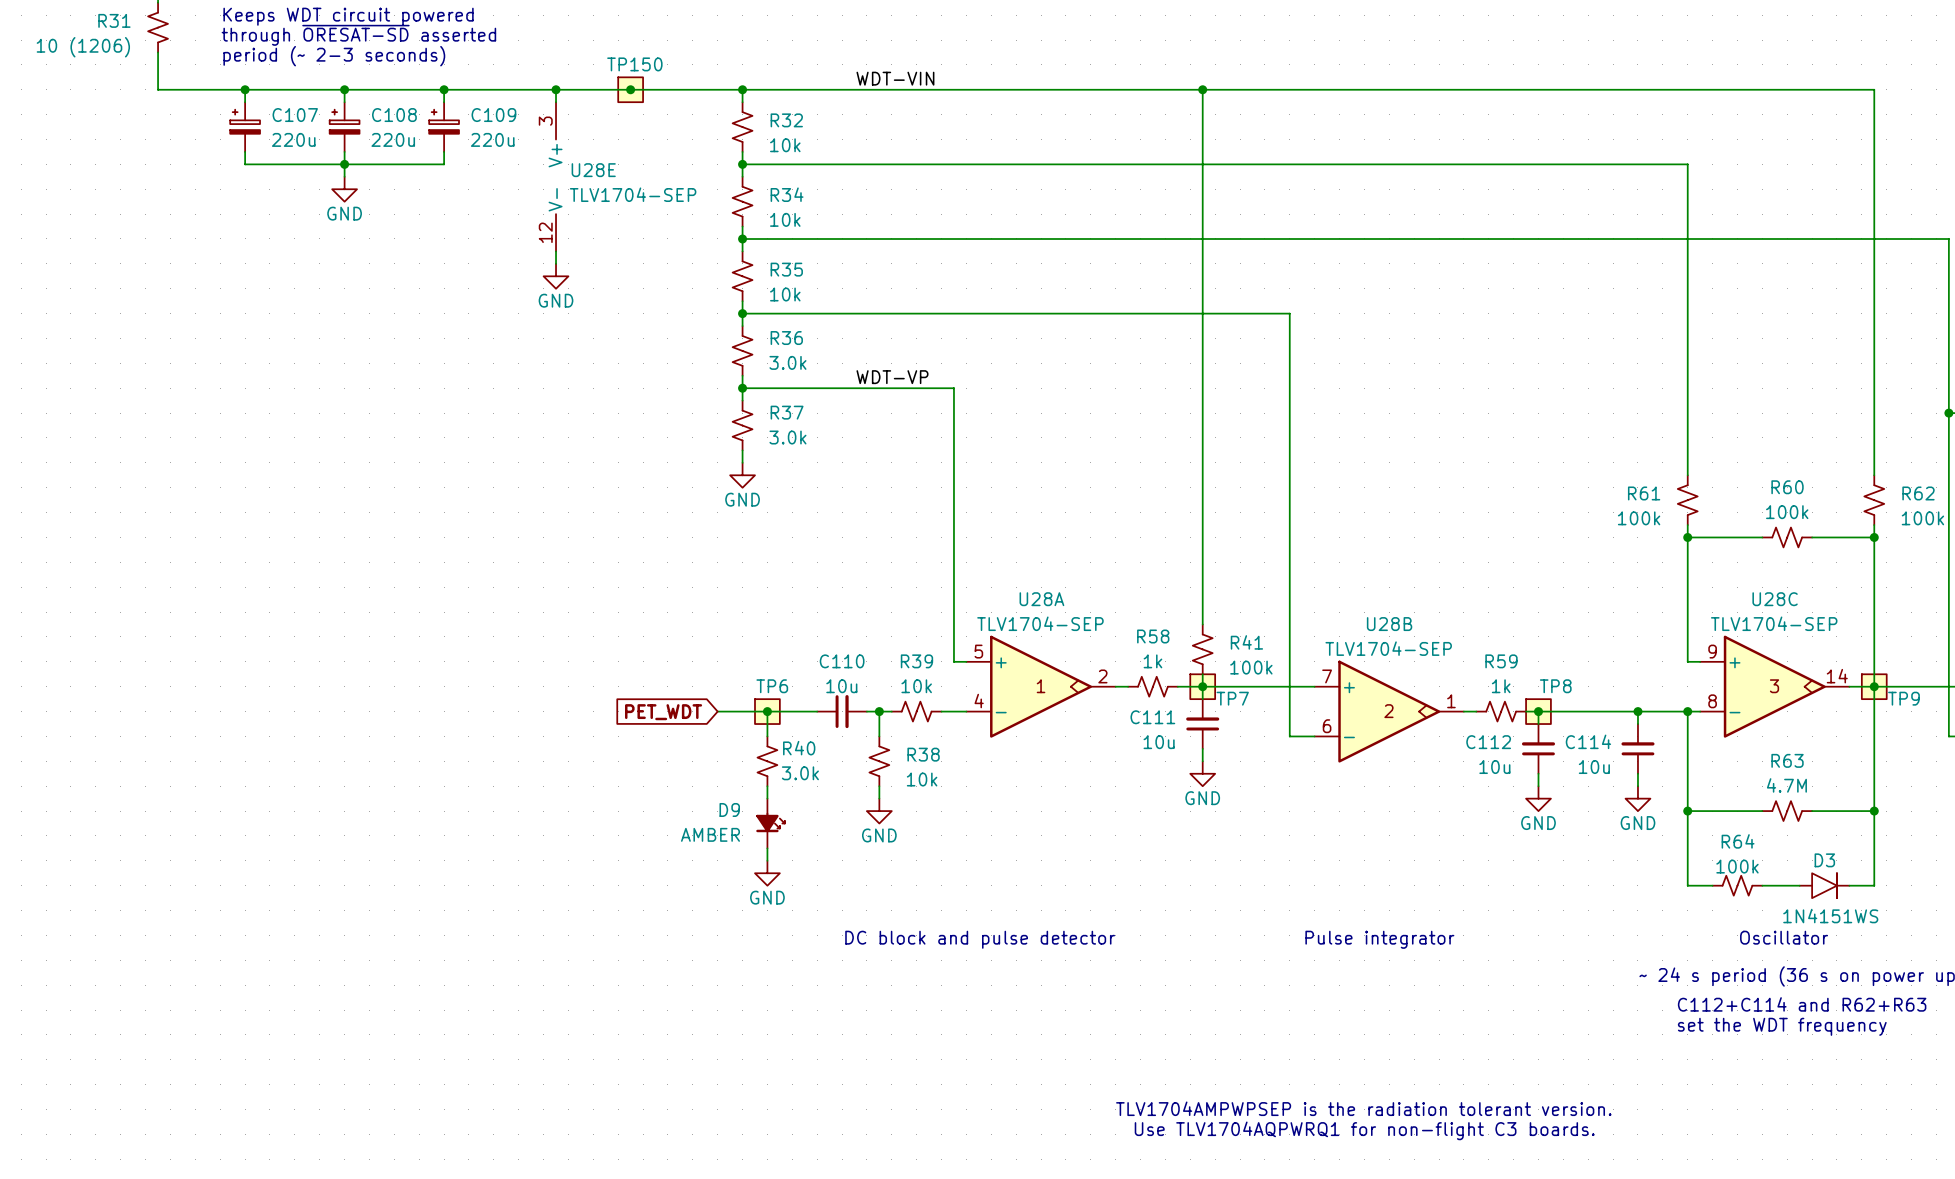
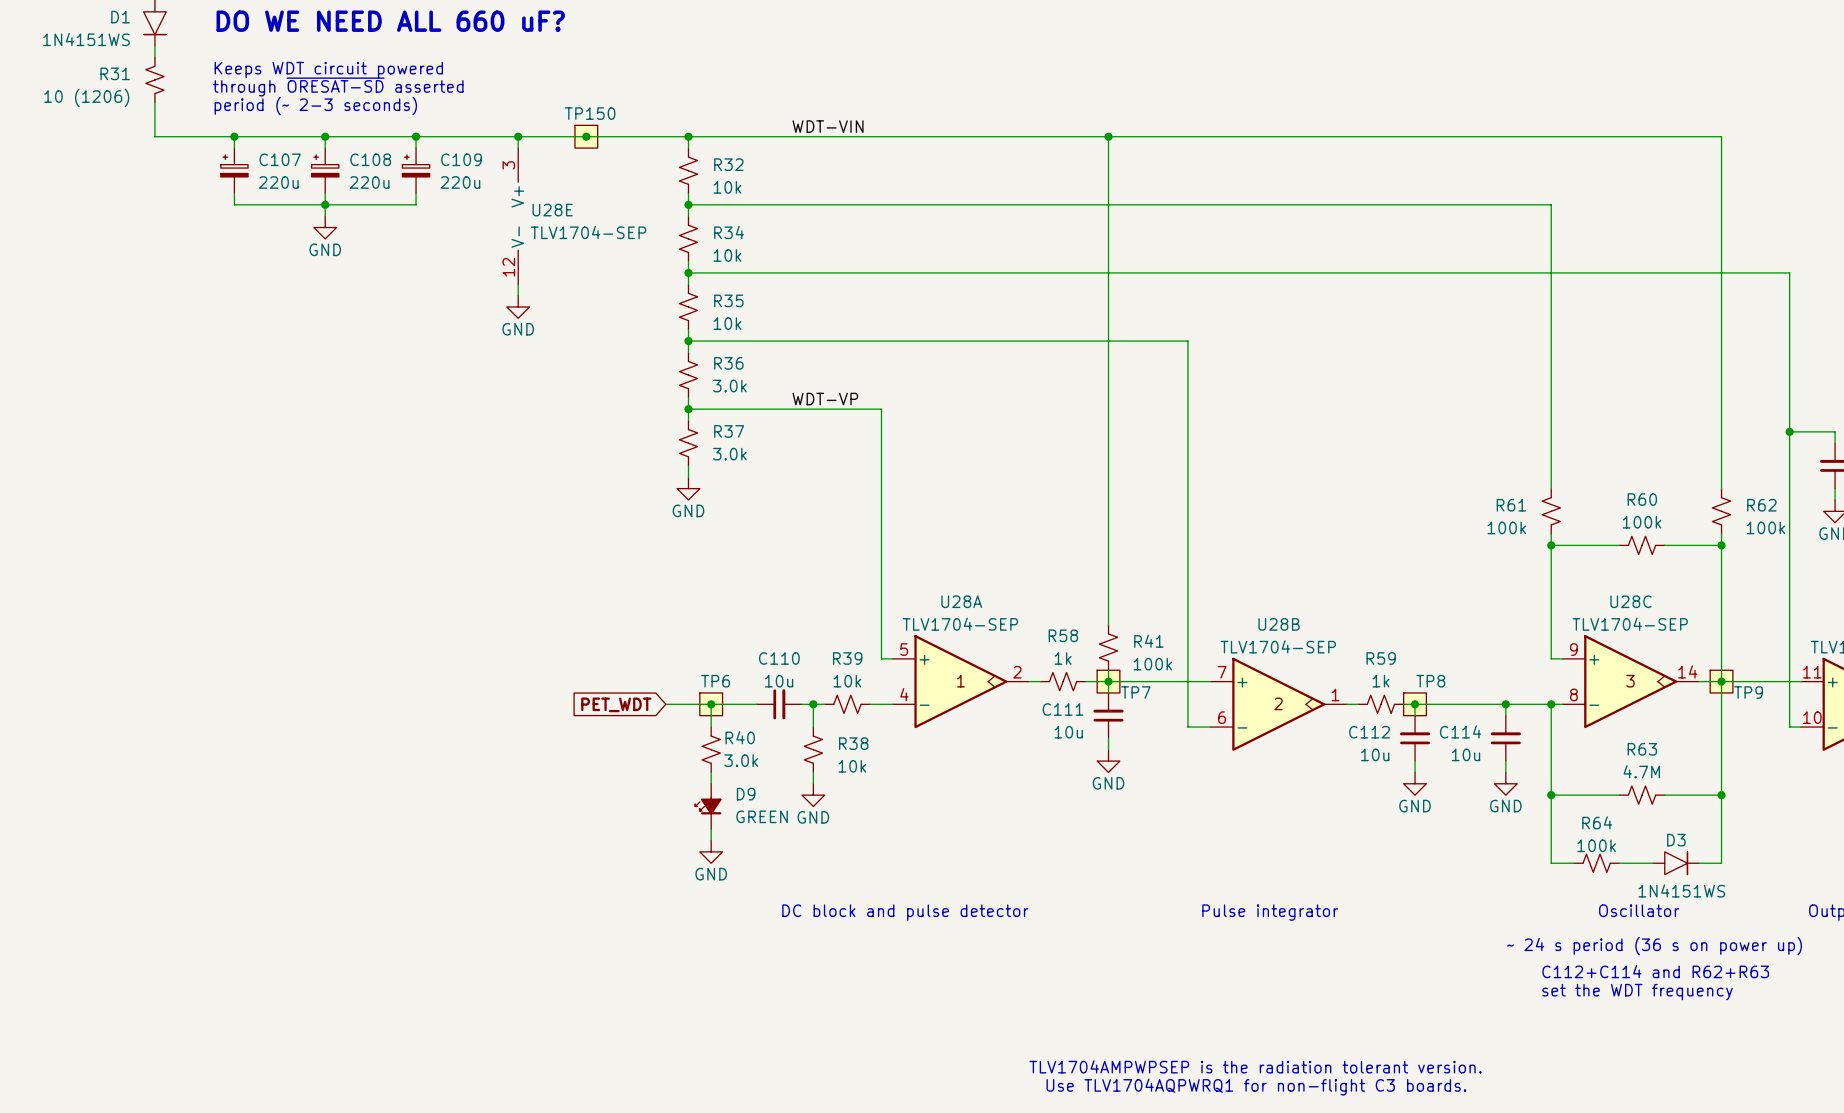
D9 flip: as is (770, 822) -> left-right (708, 805)
D9 value: AMBER (710, 834) -> GREEN (762, 816)

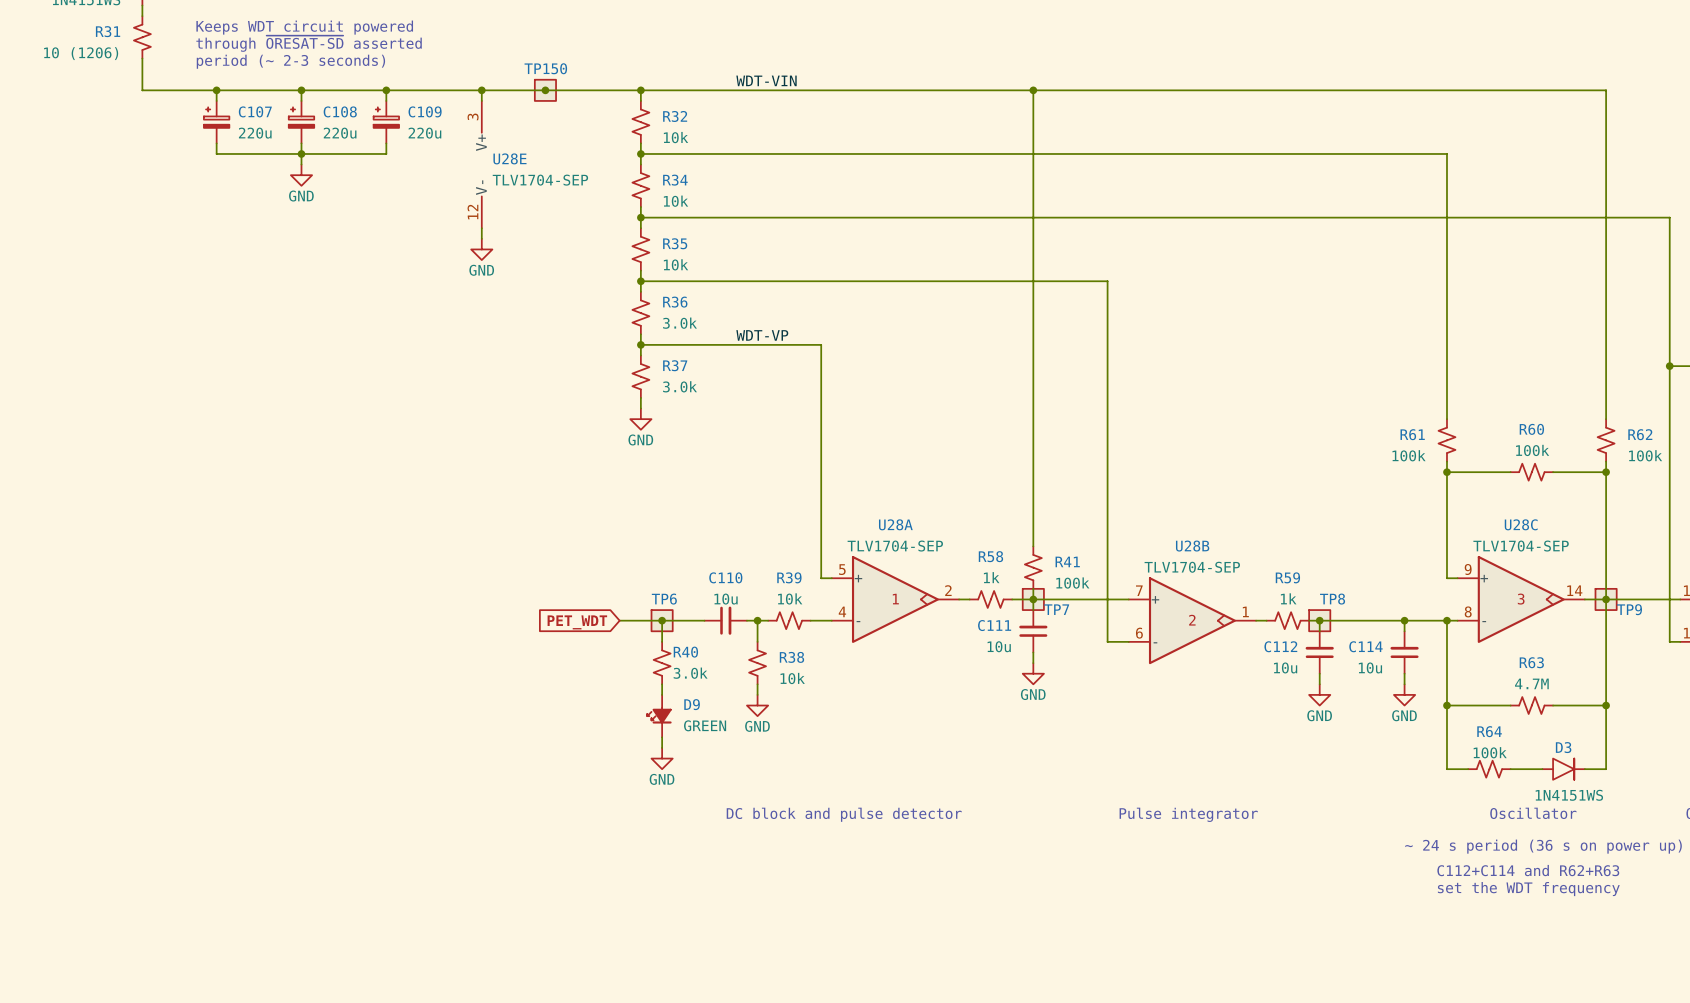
text: TLV1704AMPWPSEP is the radiation tolerant version. (1255, 1066) -> none
text: Use TLV1704AQPWRQ1 for non-flight C3 boards. (1256, 1087) -> none

